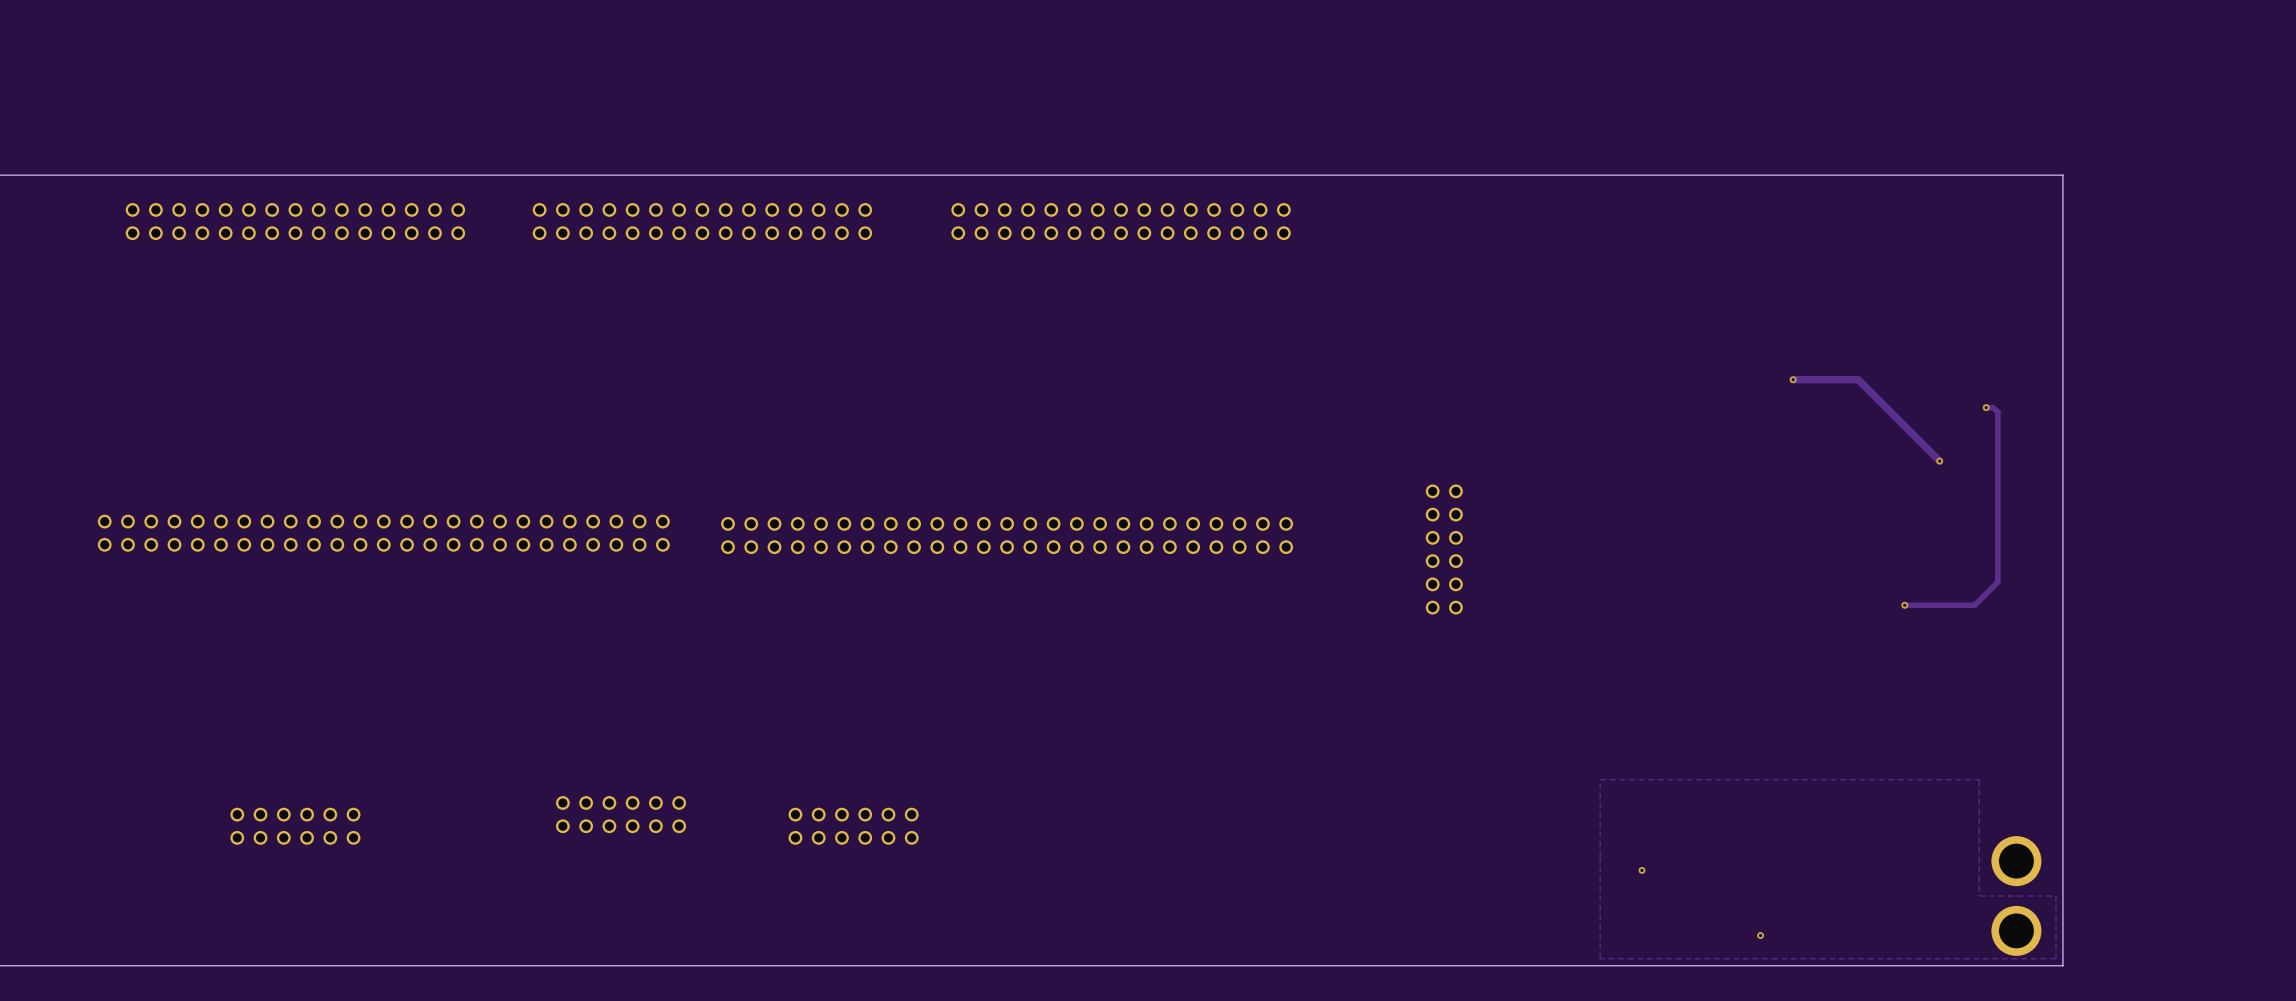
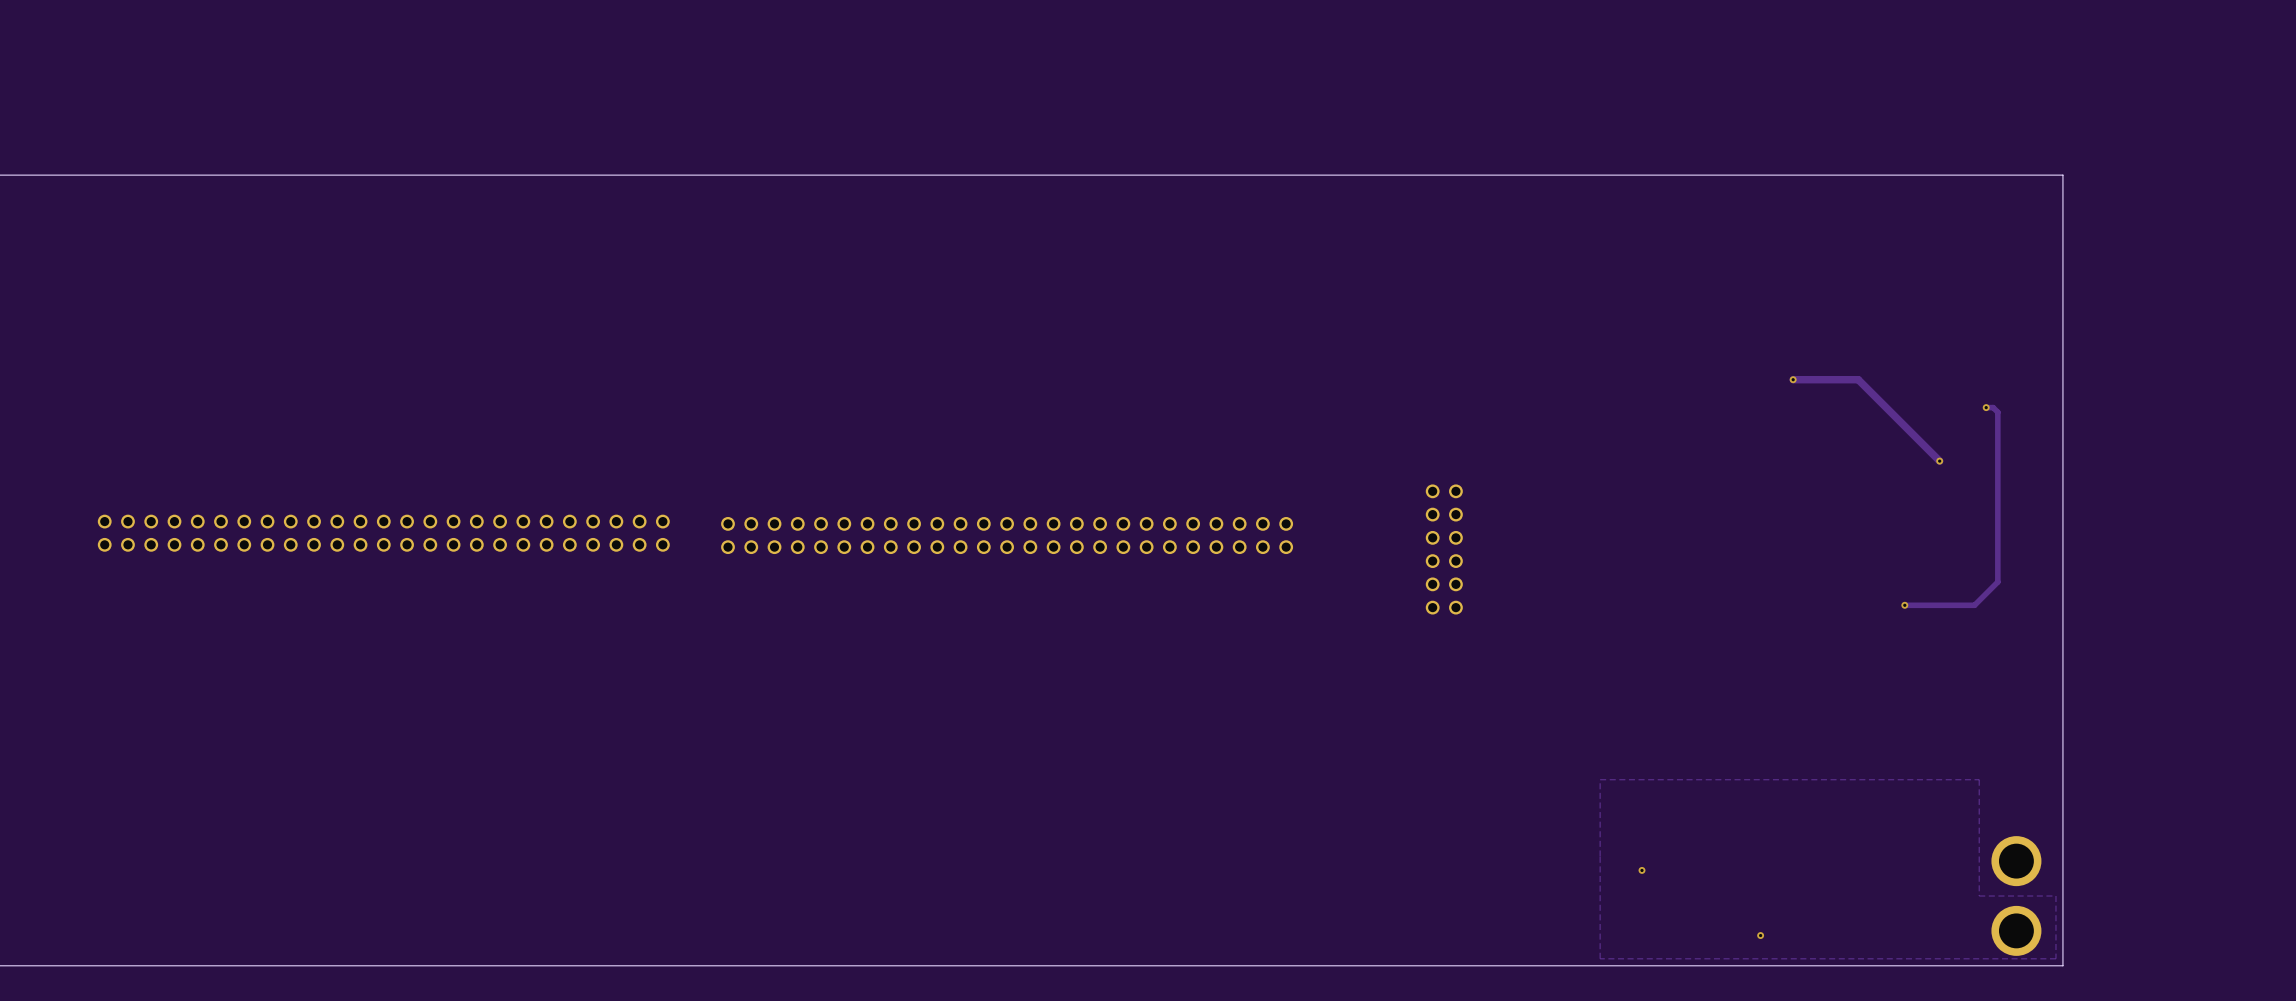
part: (295, 221) -> none
part: (702, 221) -> none
part: (1121, 221) -> none
part: (621, 814) -> none
part: (295, 826) -> none
part: (853, 826) -> none

